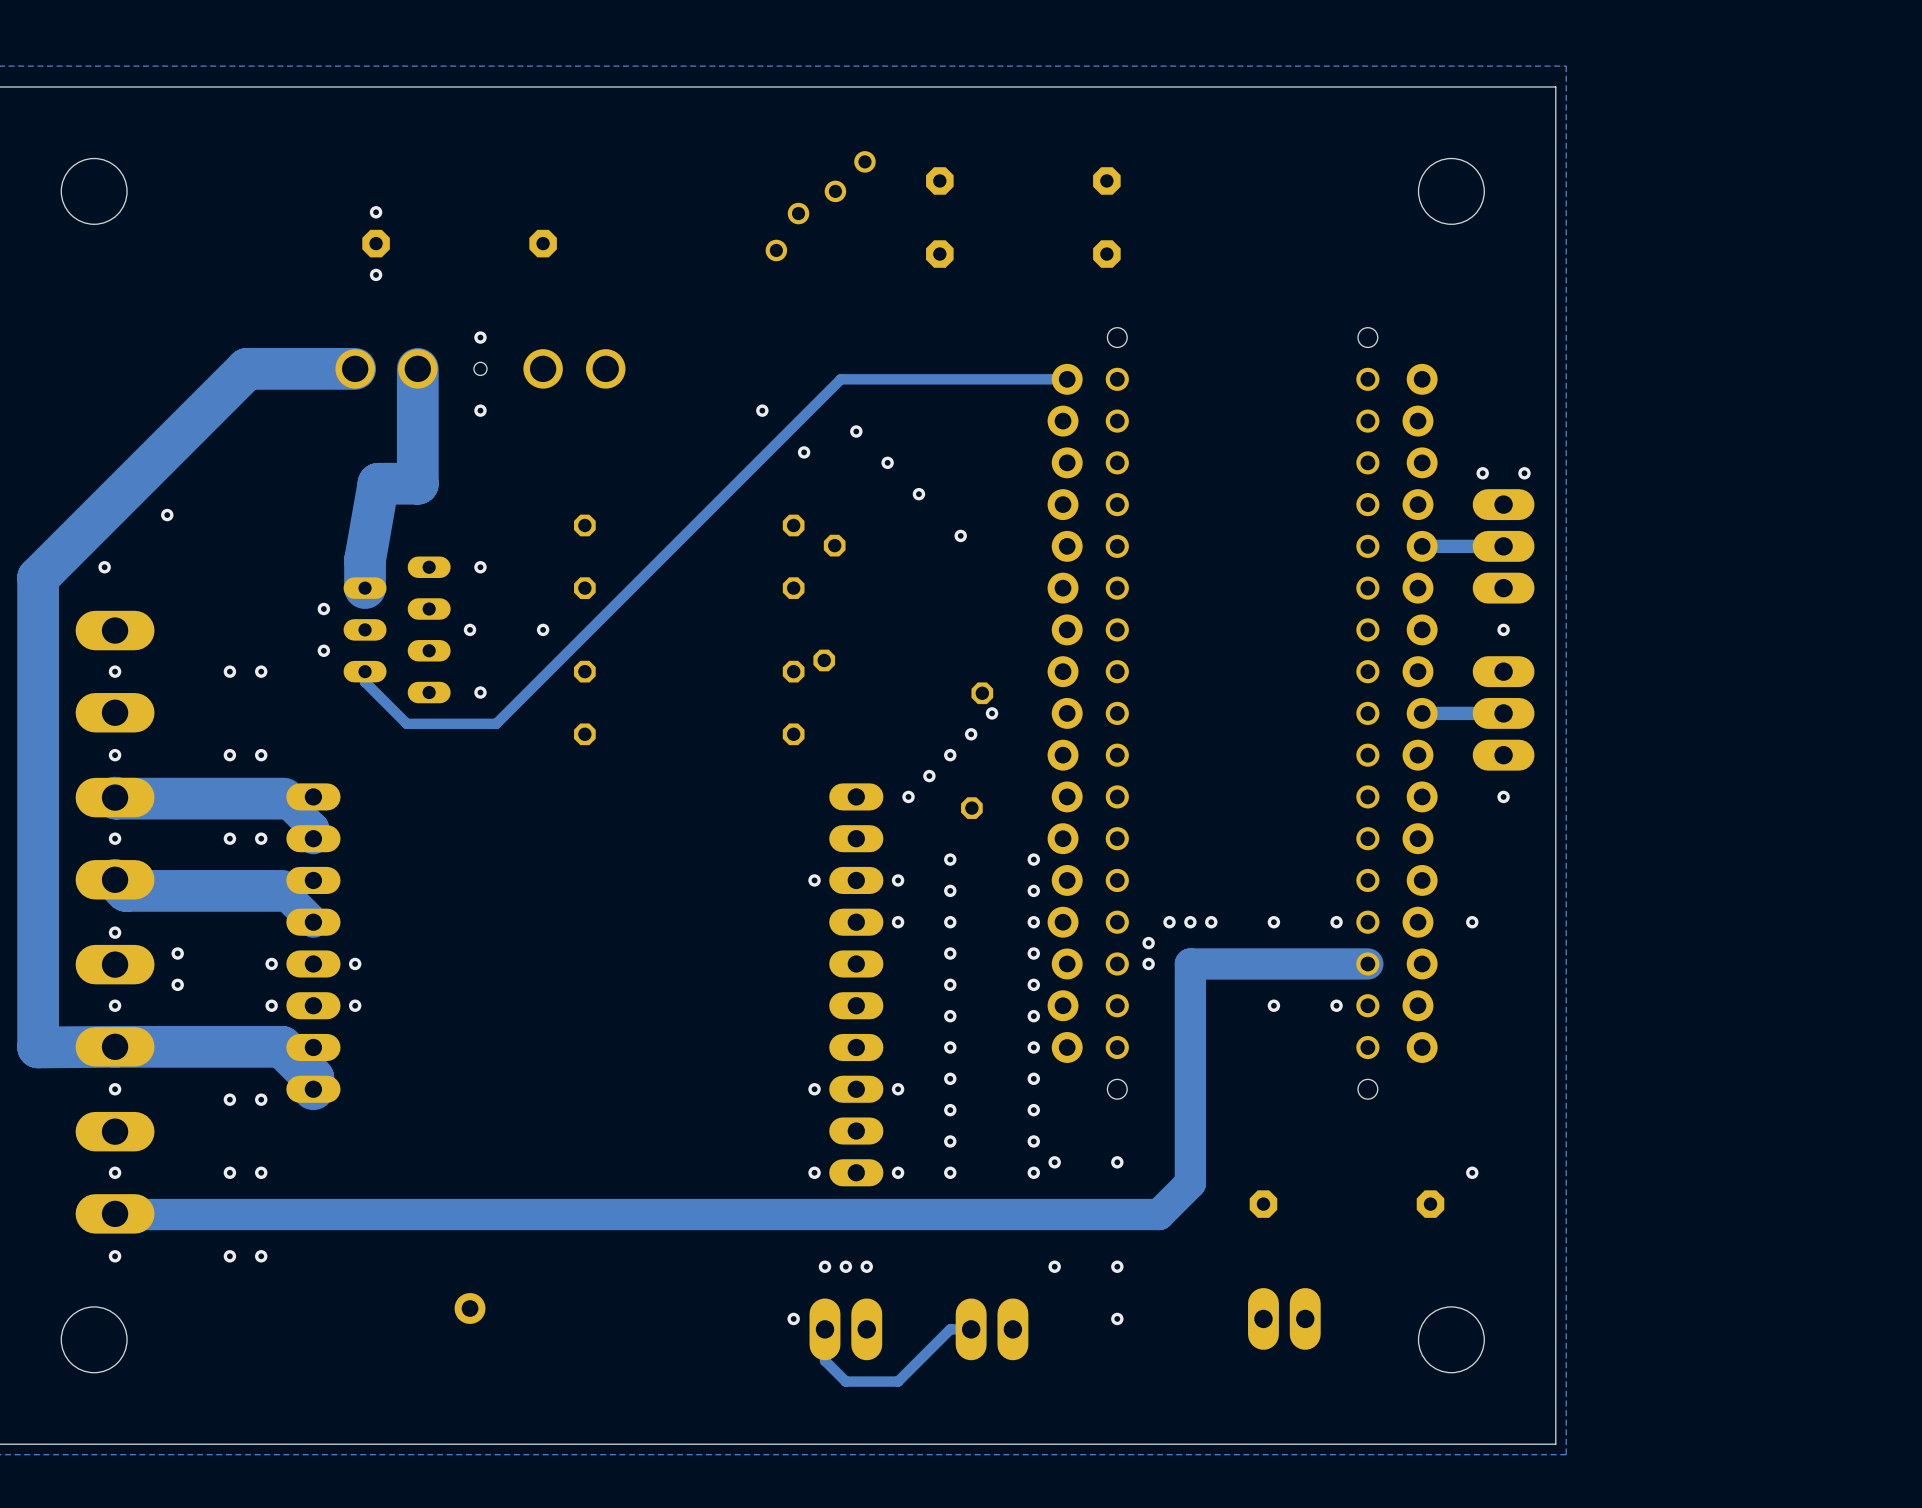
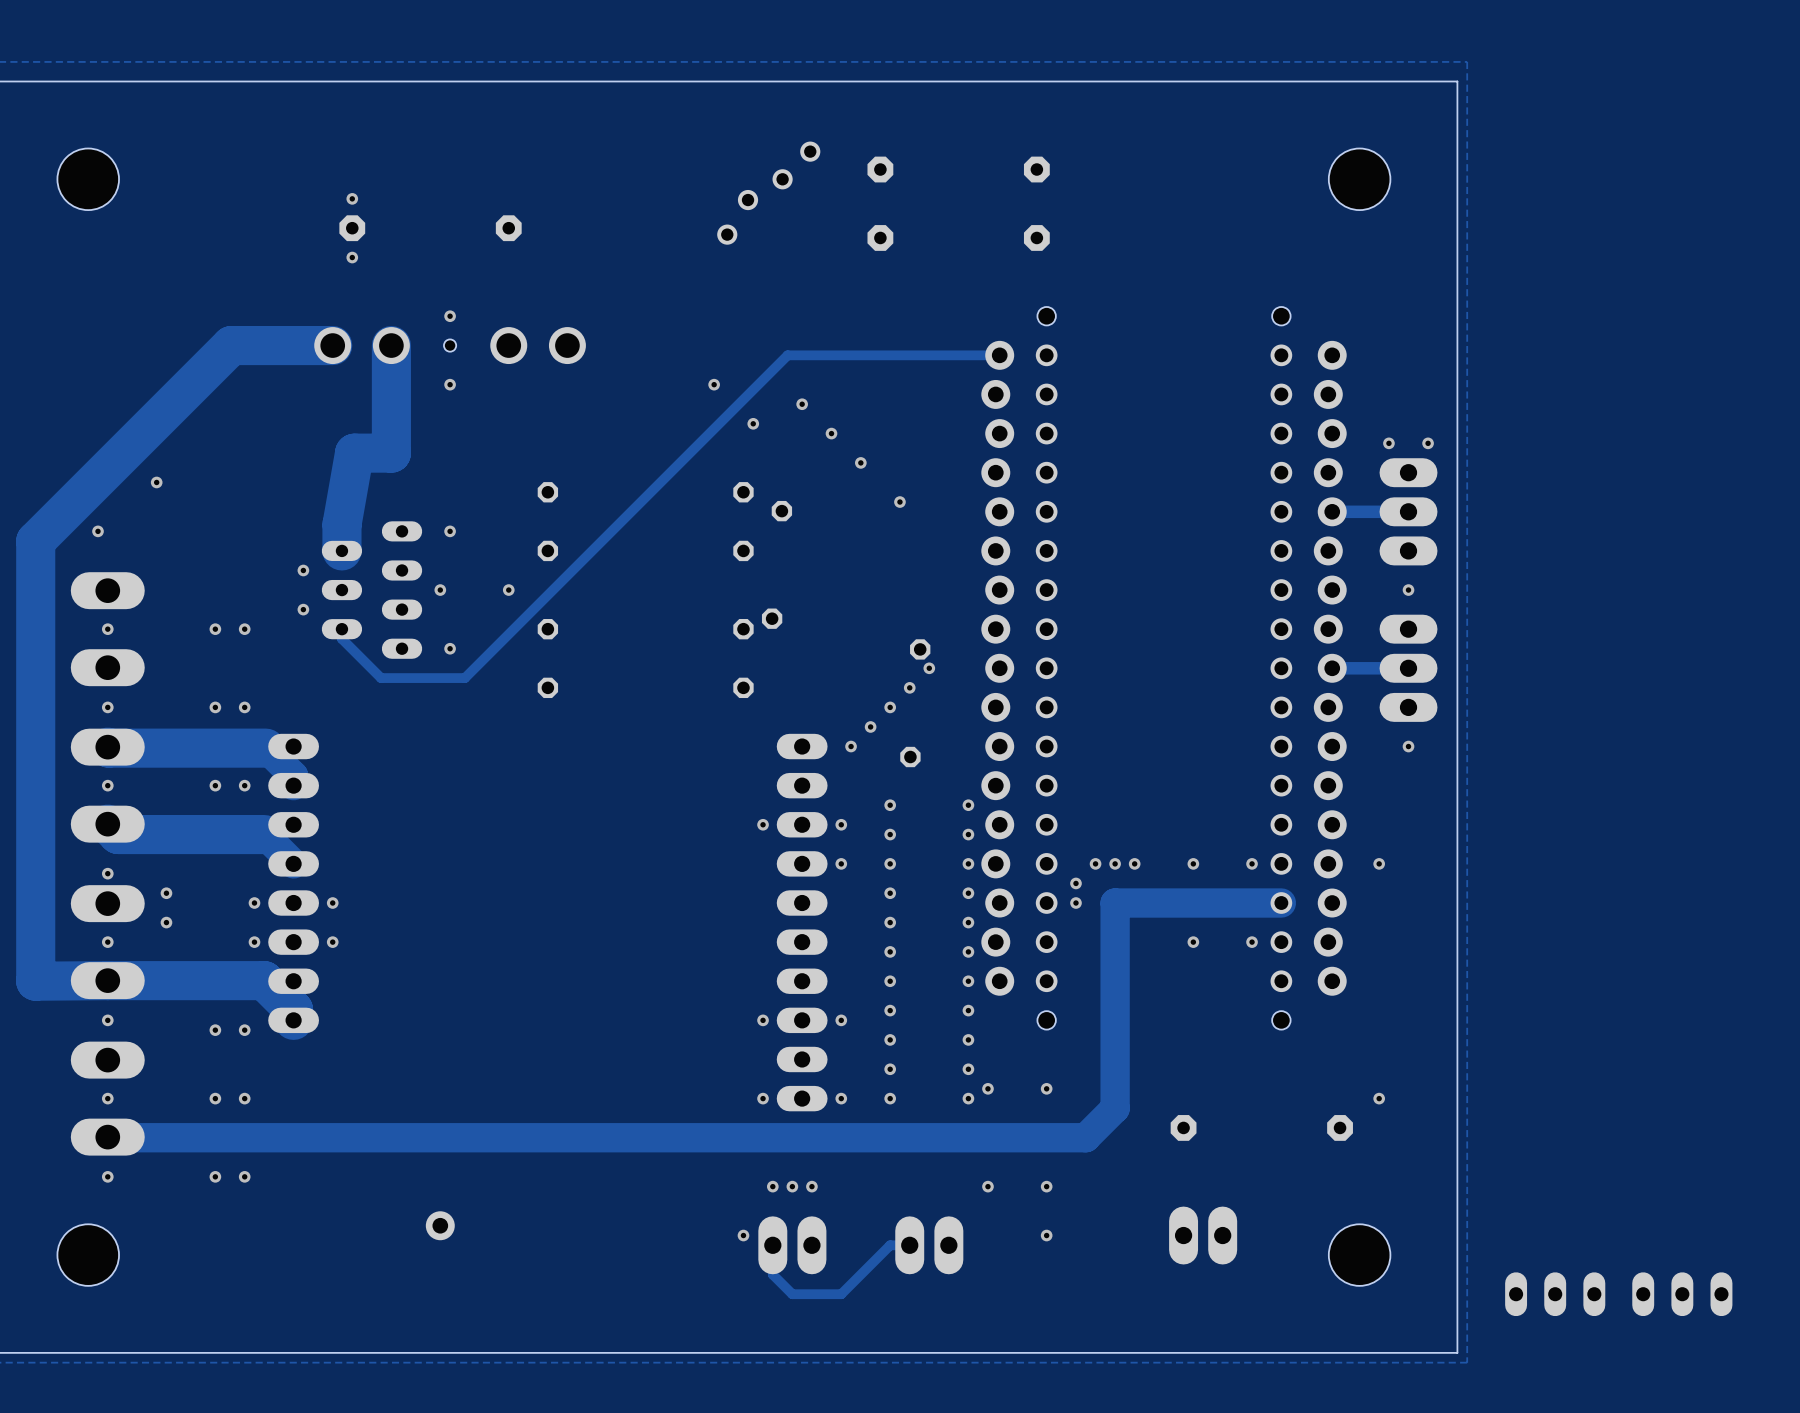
part: none -> (1555, 1294)
part: none -> (1682, 1294)

